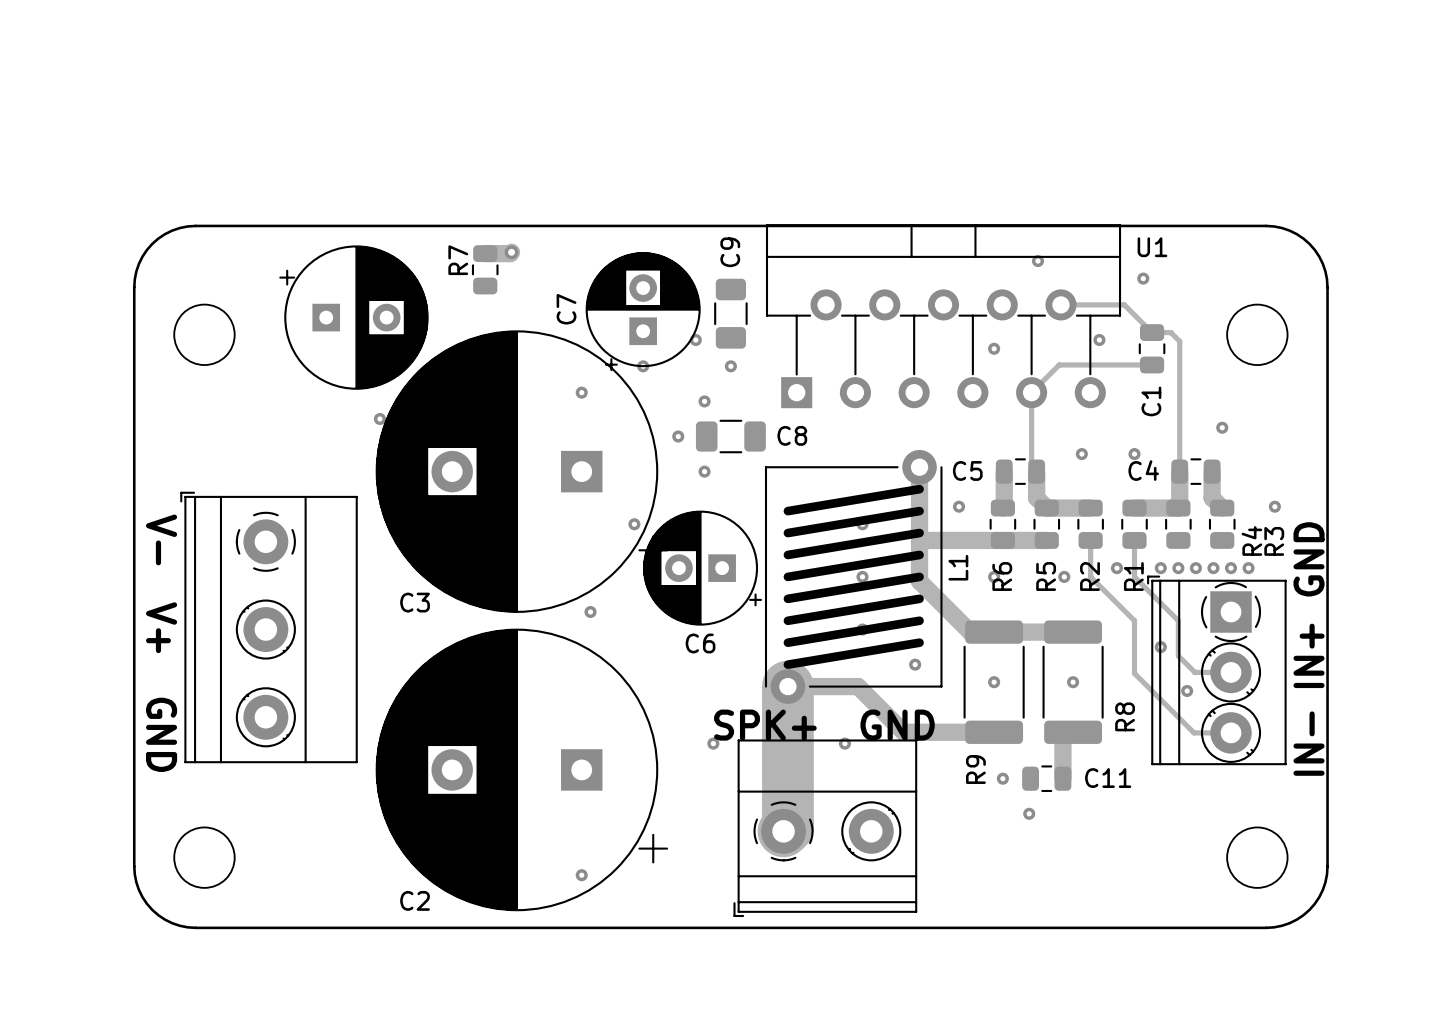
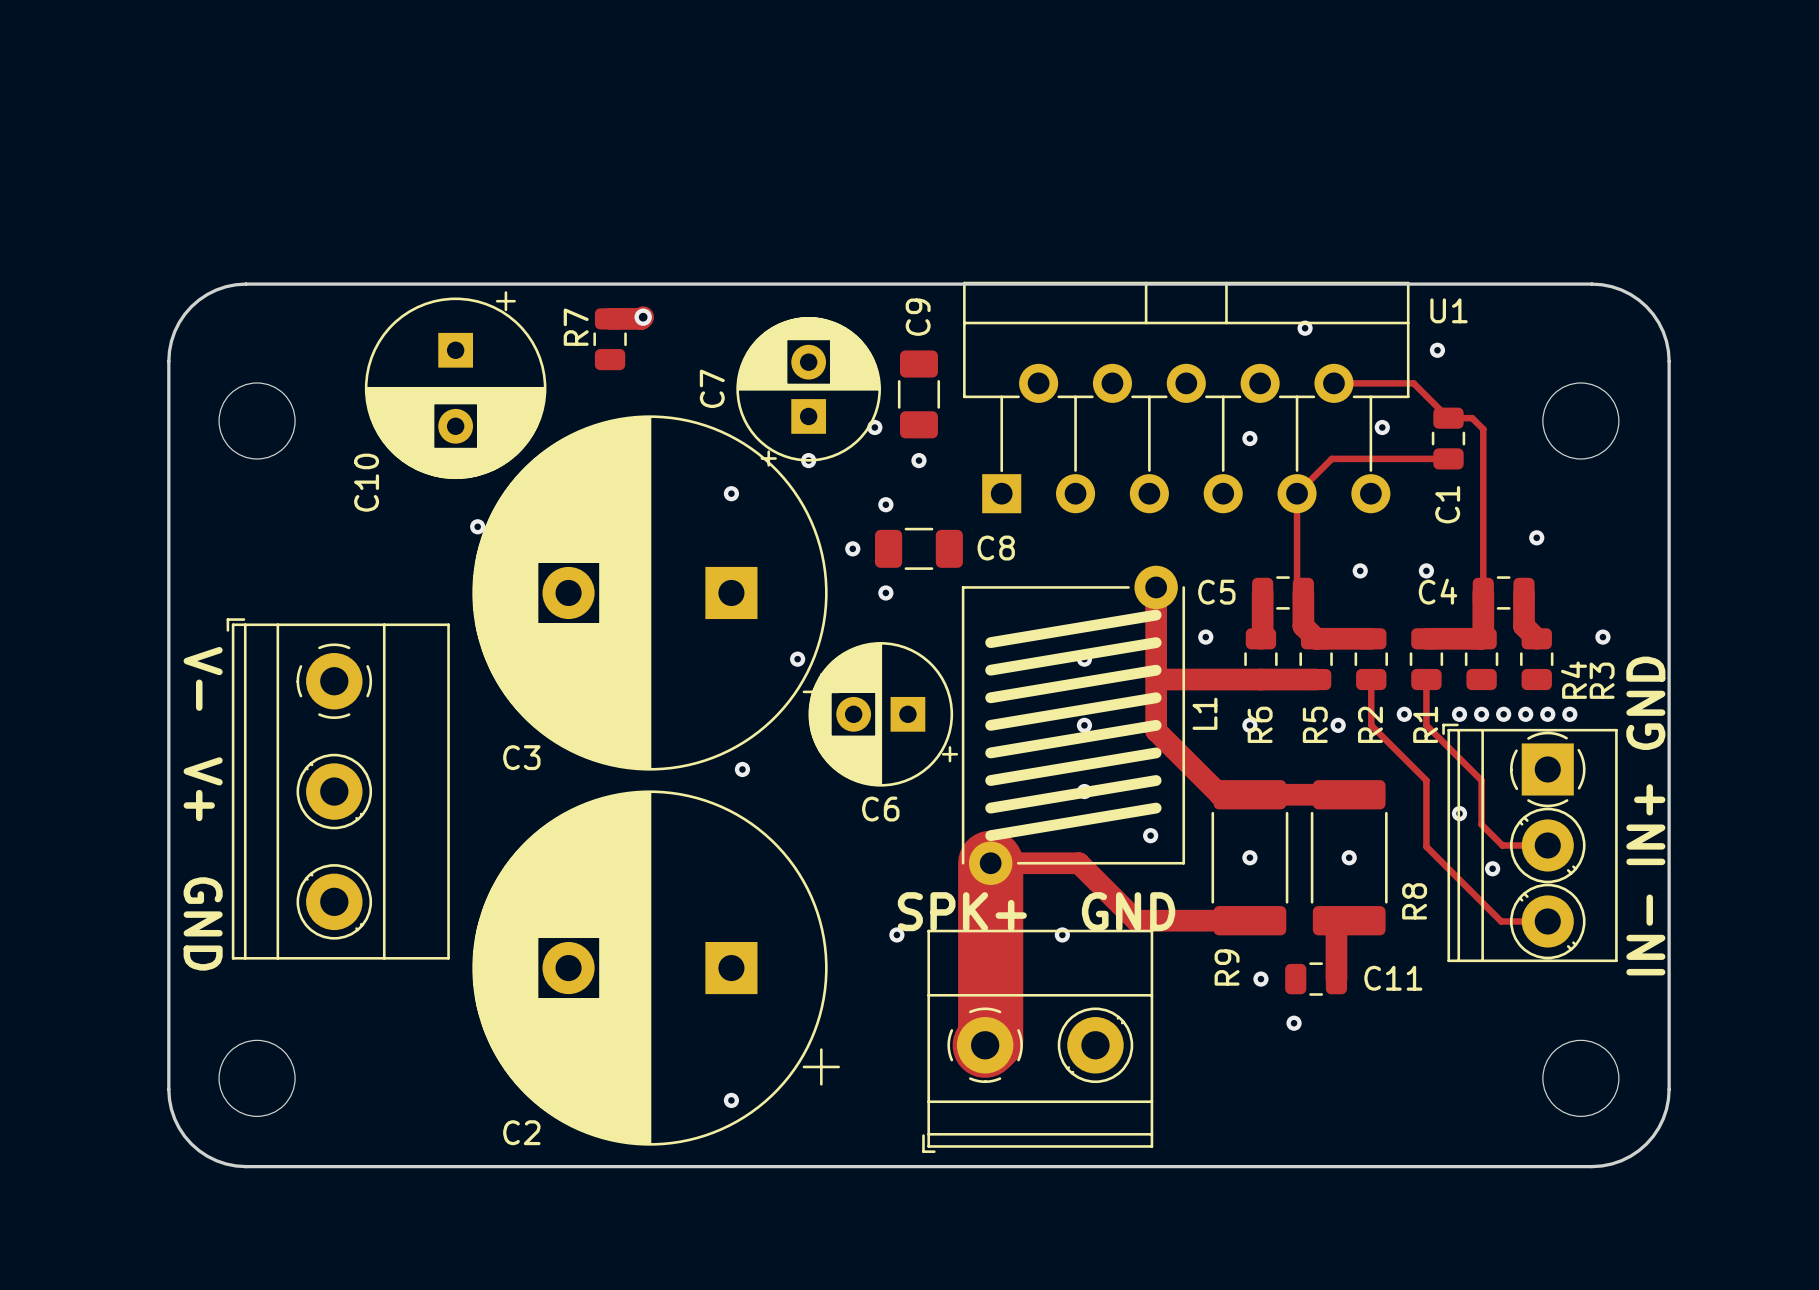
C10 rotation: 0° (353, 317) -> 90° clockwise (455, 385)

